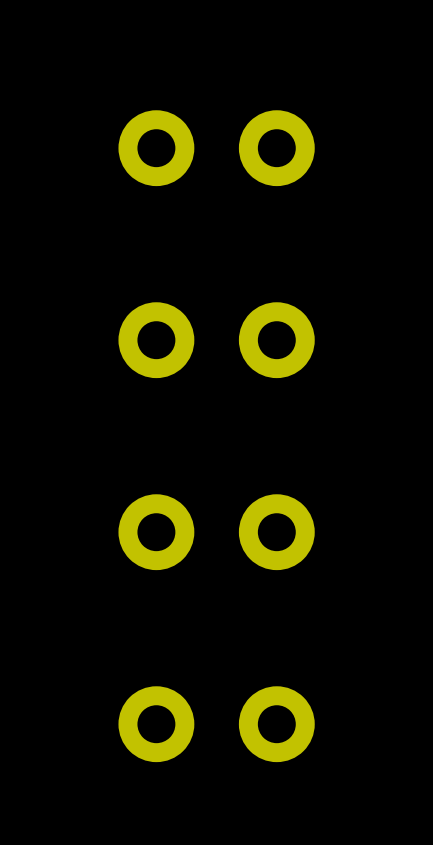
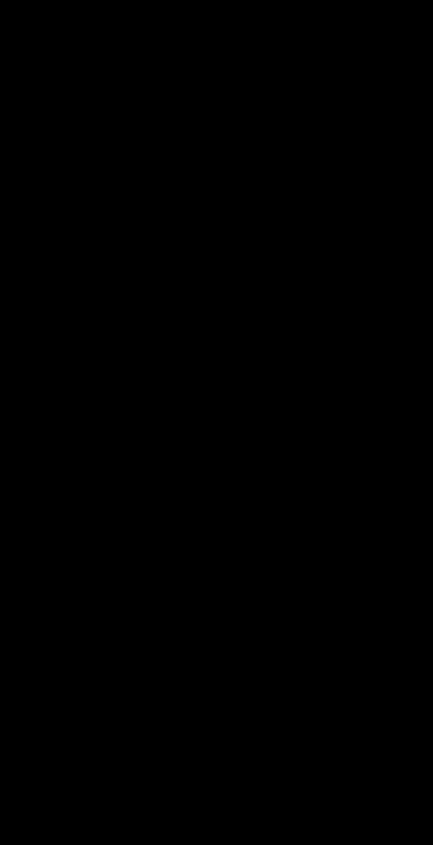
part: (216, 148) -> none
part: (216, 340) -> none
part: (216, 532) -> none
part: (216, 724) -> none

